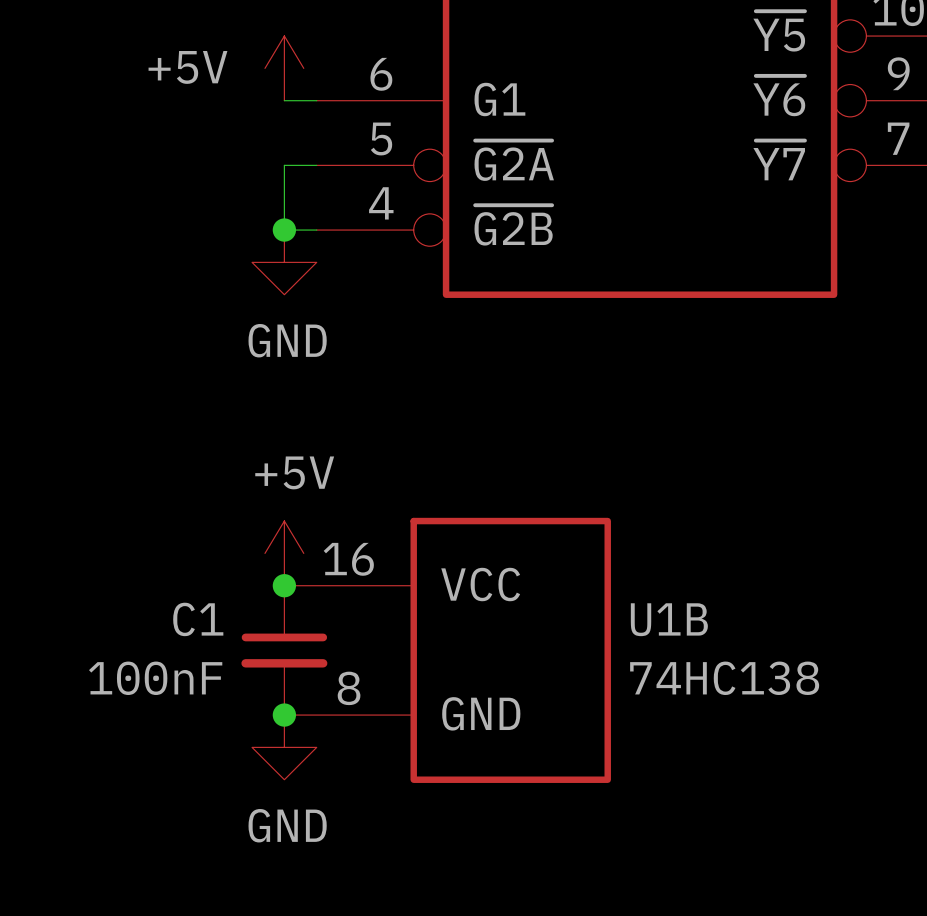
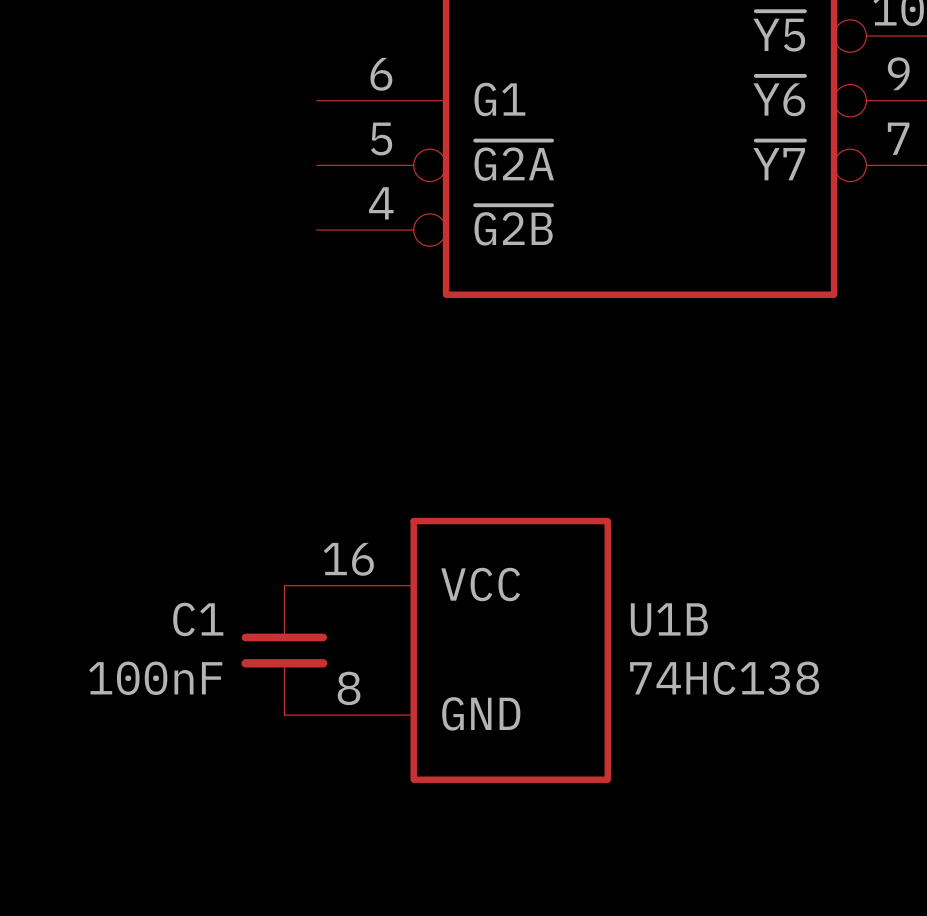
power symbol: +5V (284, 68) -> none
wire: (284, 100) (316, 100) -> none
wire: (316, 165) (284, 165) (284, 230) (316, 230) -> none
junction: (284, 230) -> none
power symbol: GND (284, 262) -> none
power symbol: +5V (284, 553) -> none
junction: (284, 585) -> none
junction: (284, 715) -> none
power symbol: GND (284, 747) -> none

